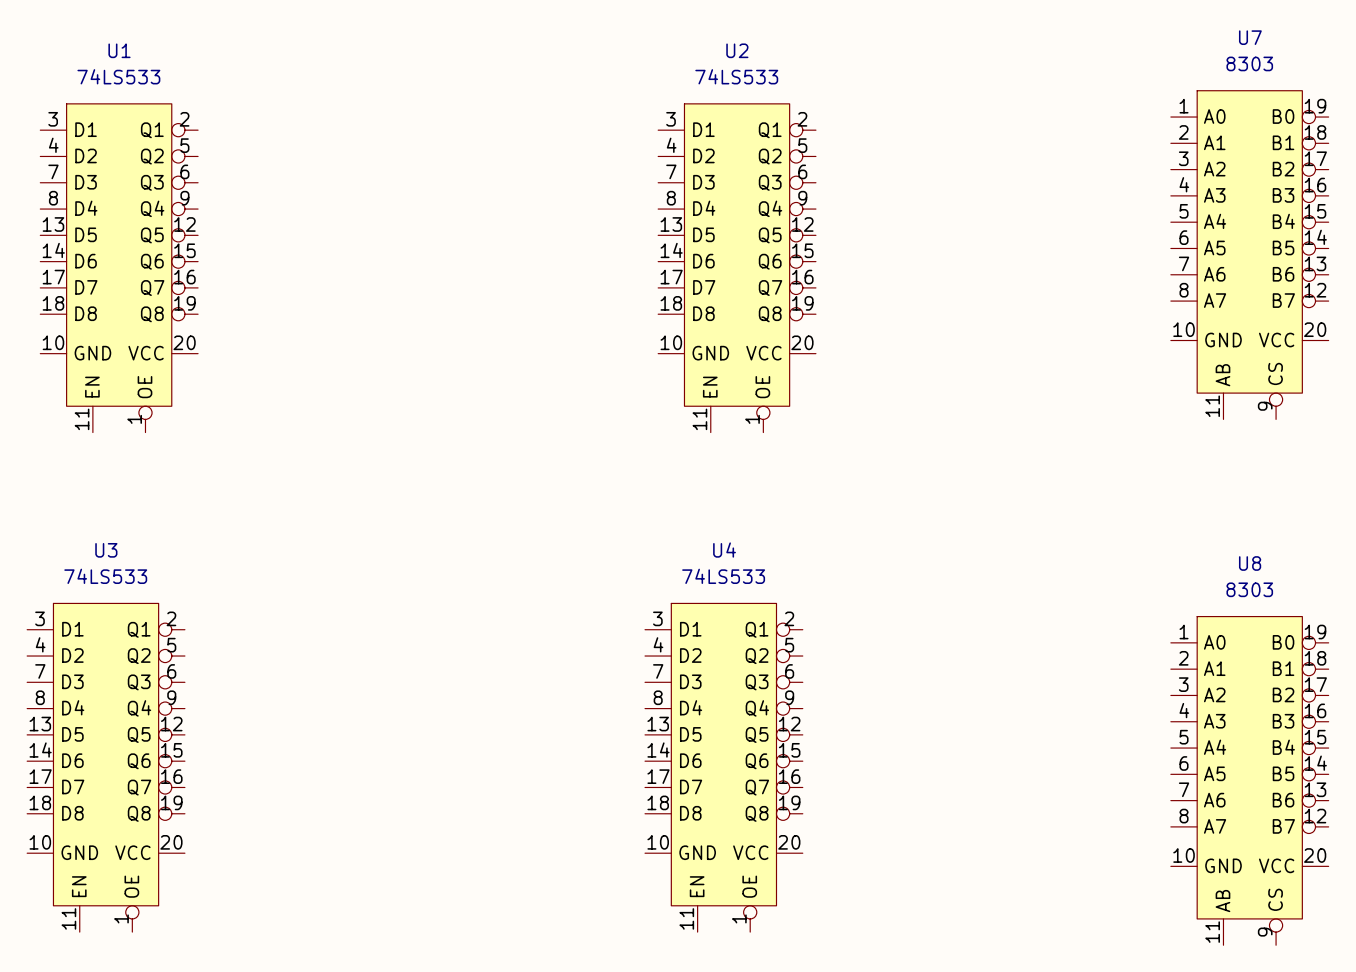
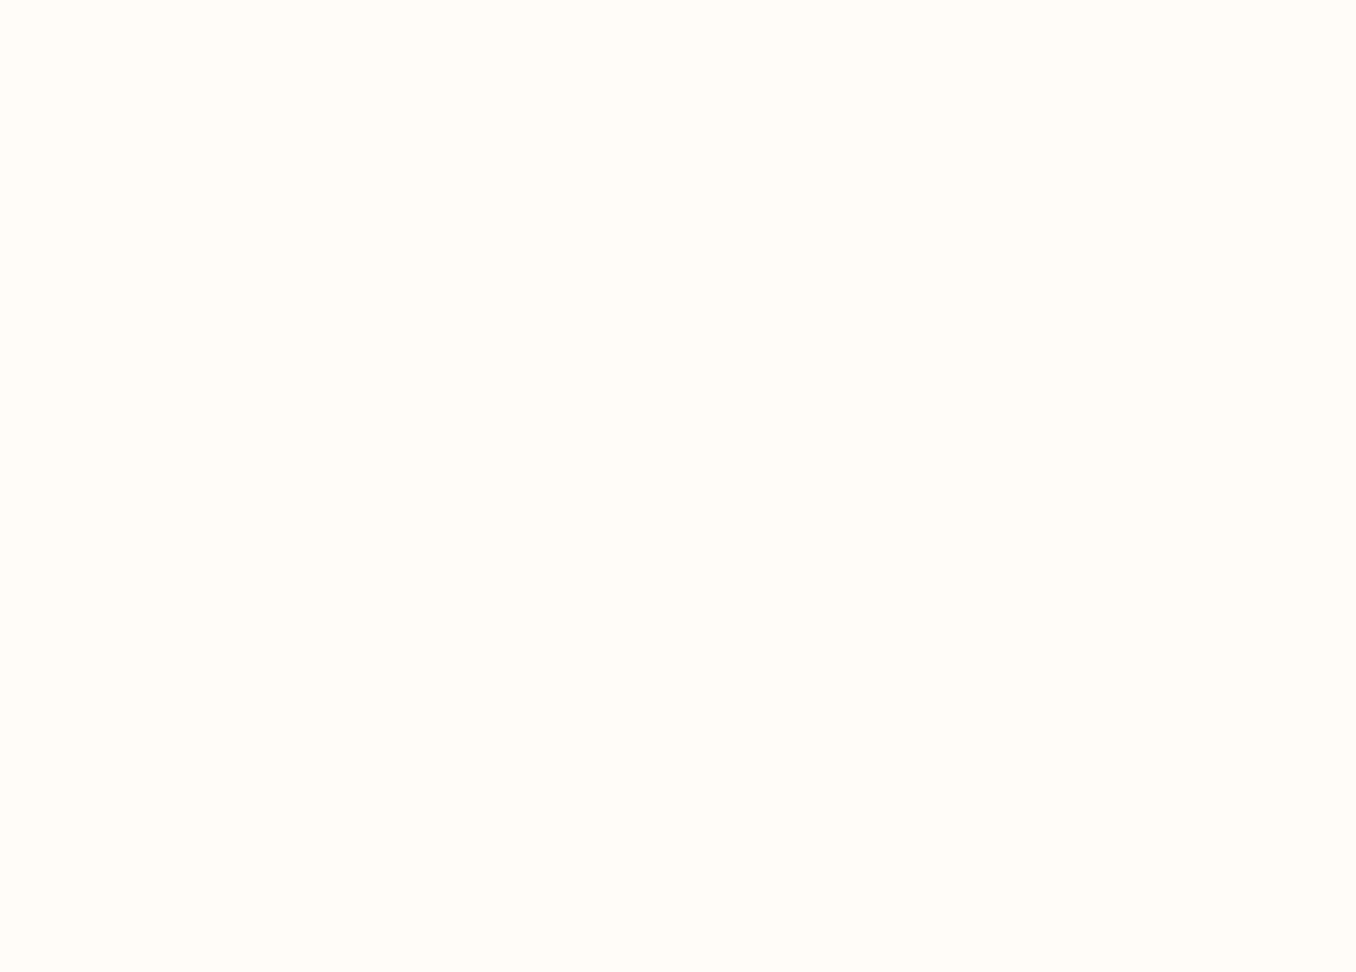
U7: 8303 (1249, 255) -> none
U1: 74LS533 (119, 268) -> none
U2: 74LS533 (737, 268) -> none
U3: 74LS533 (106, 767) -> none
U4: 74LS533 (723, 767) -> none
U8: 8303 (1249, 780) -> none

